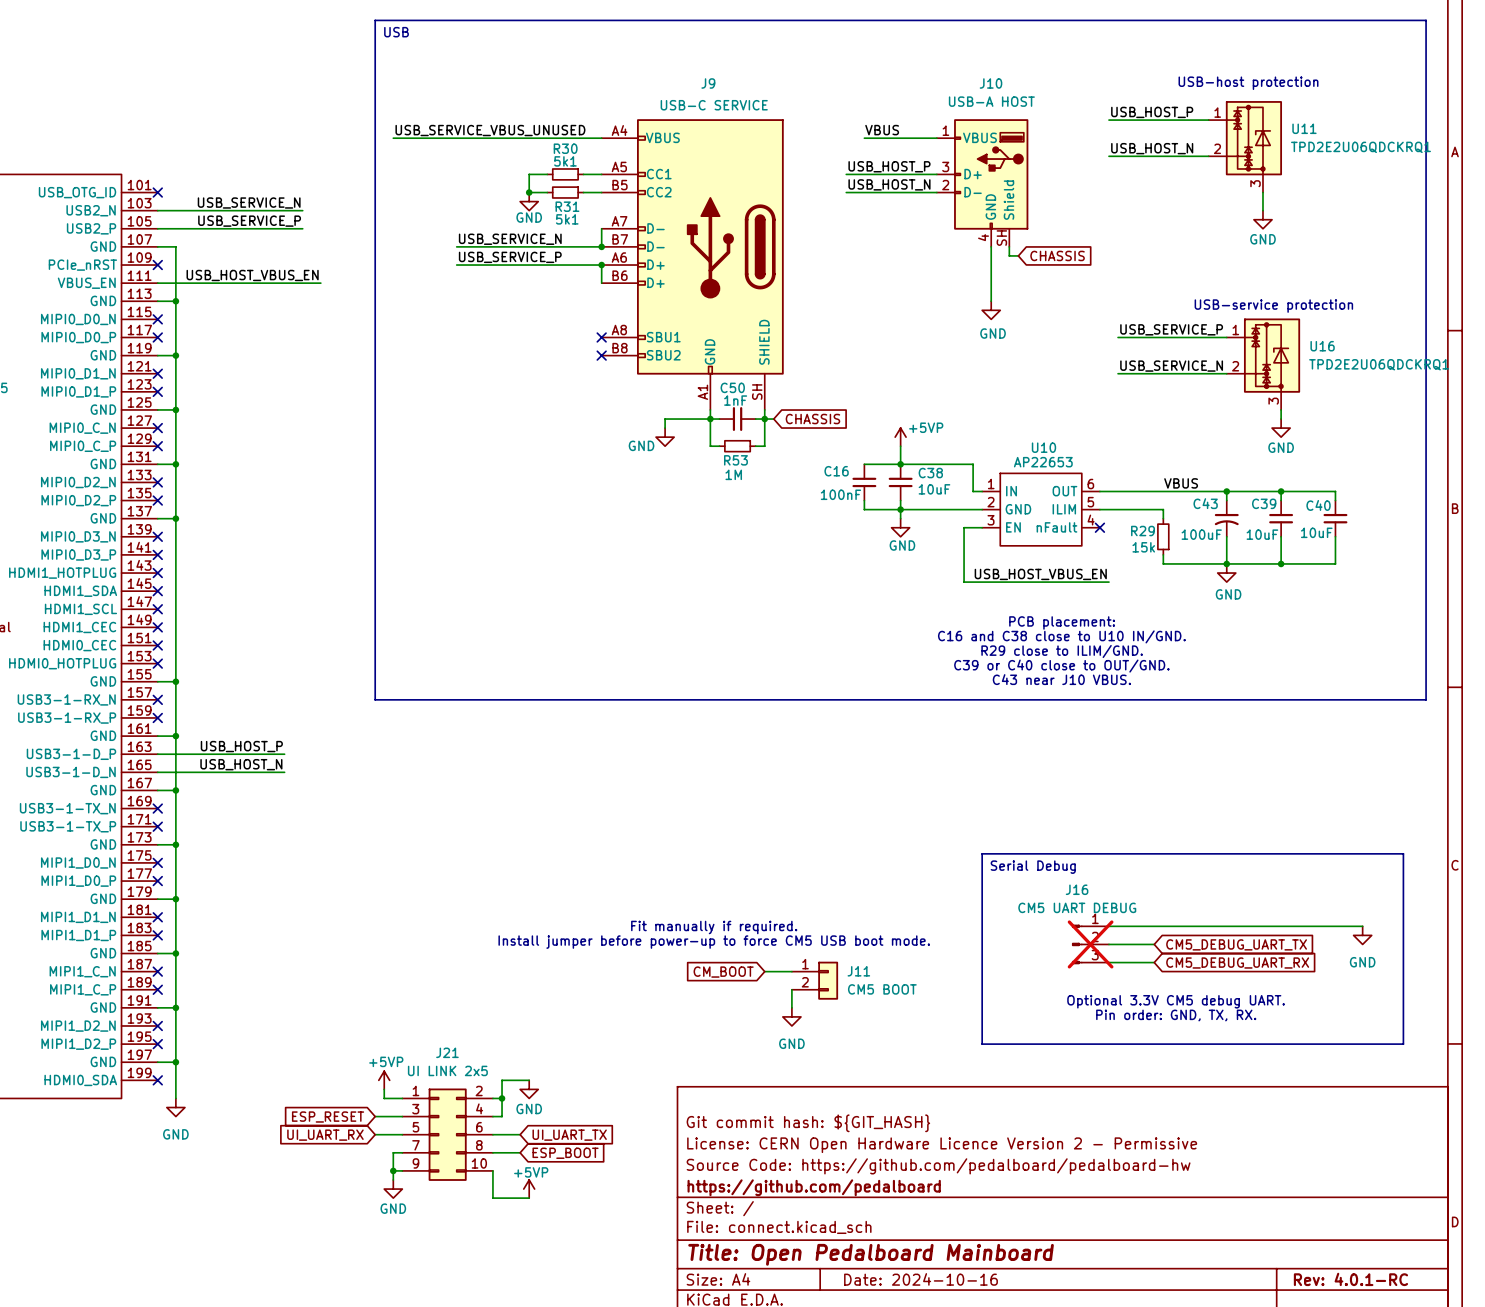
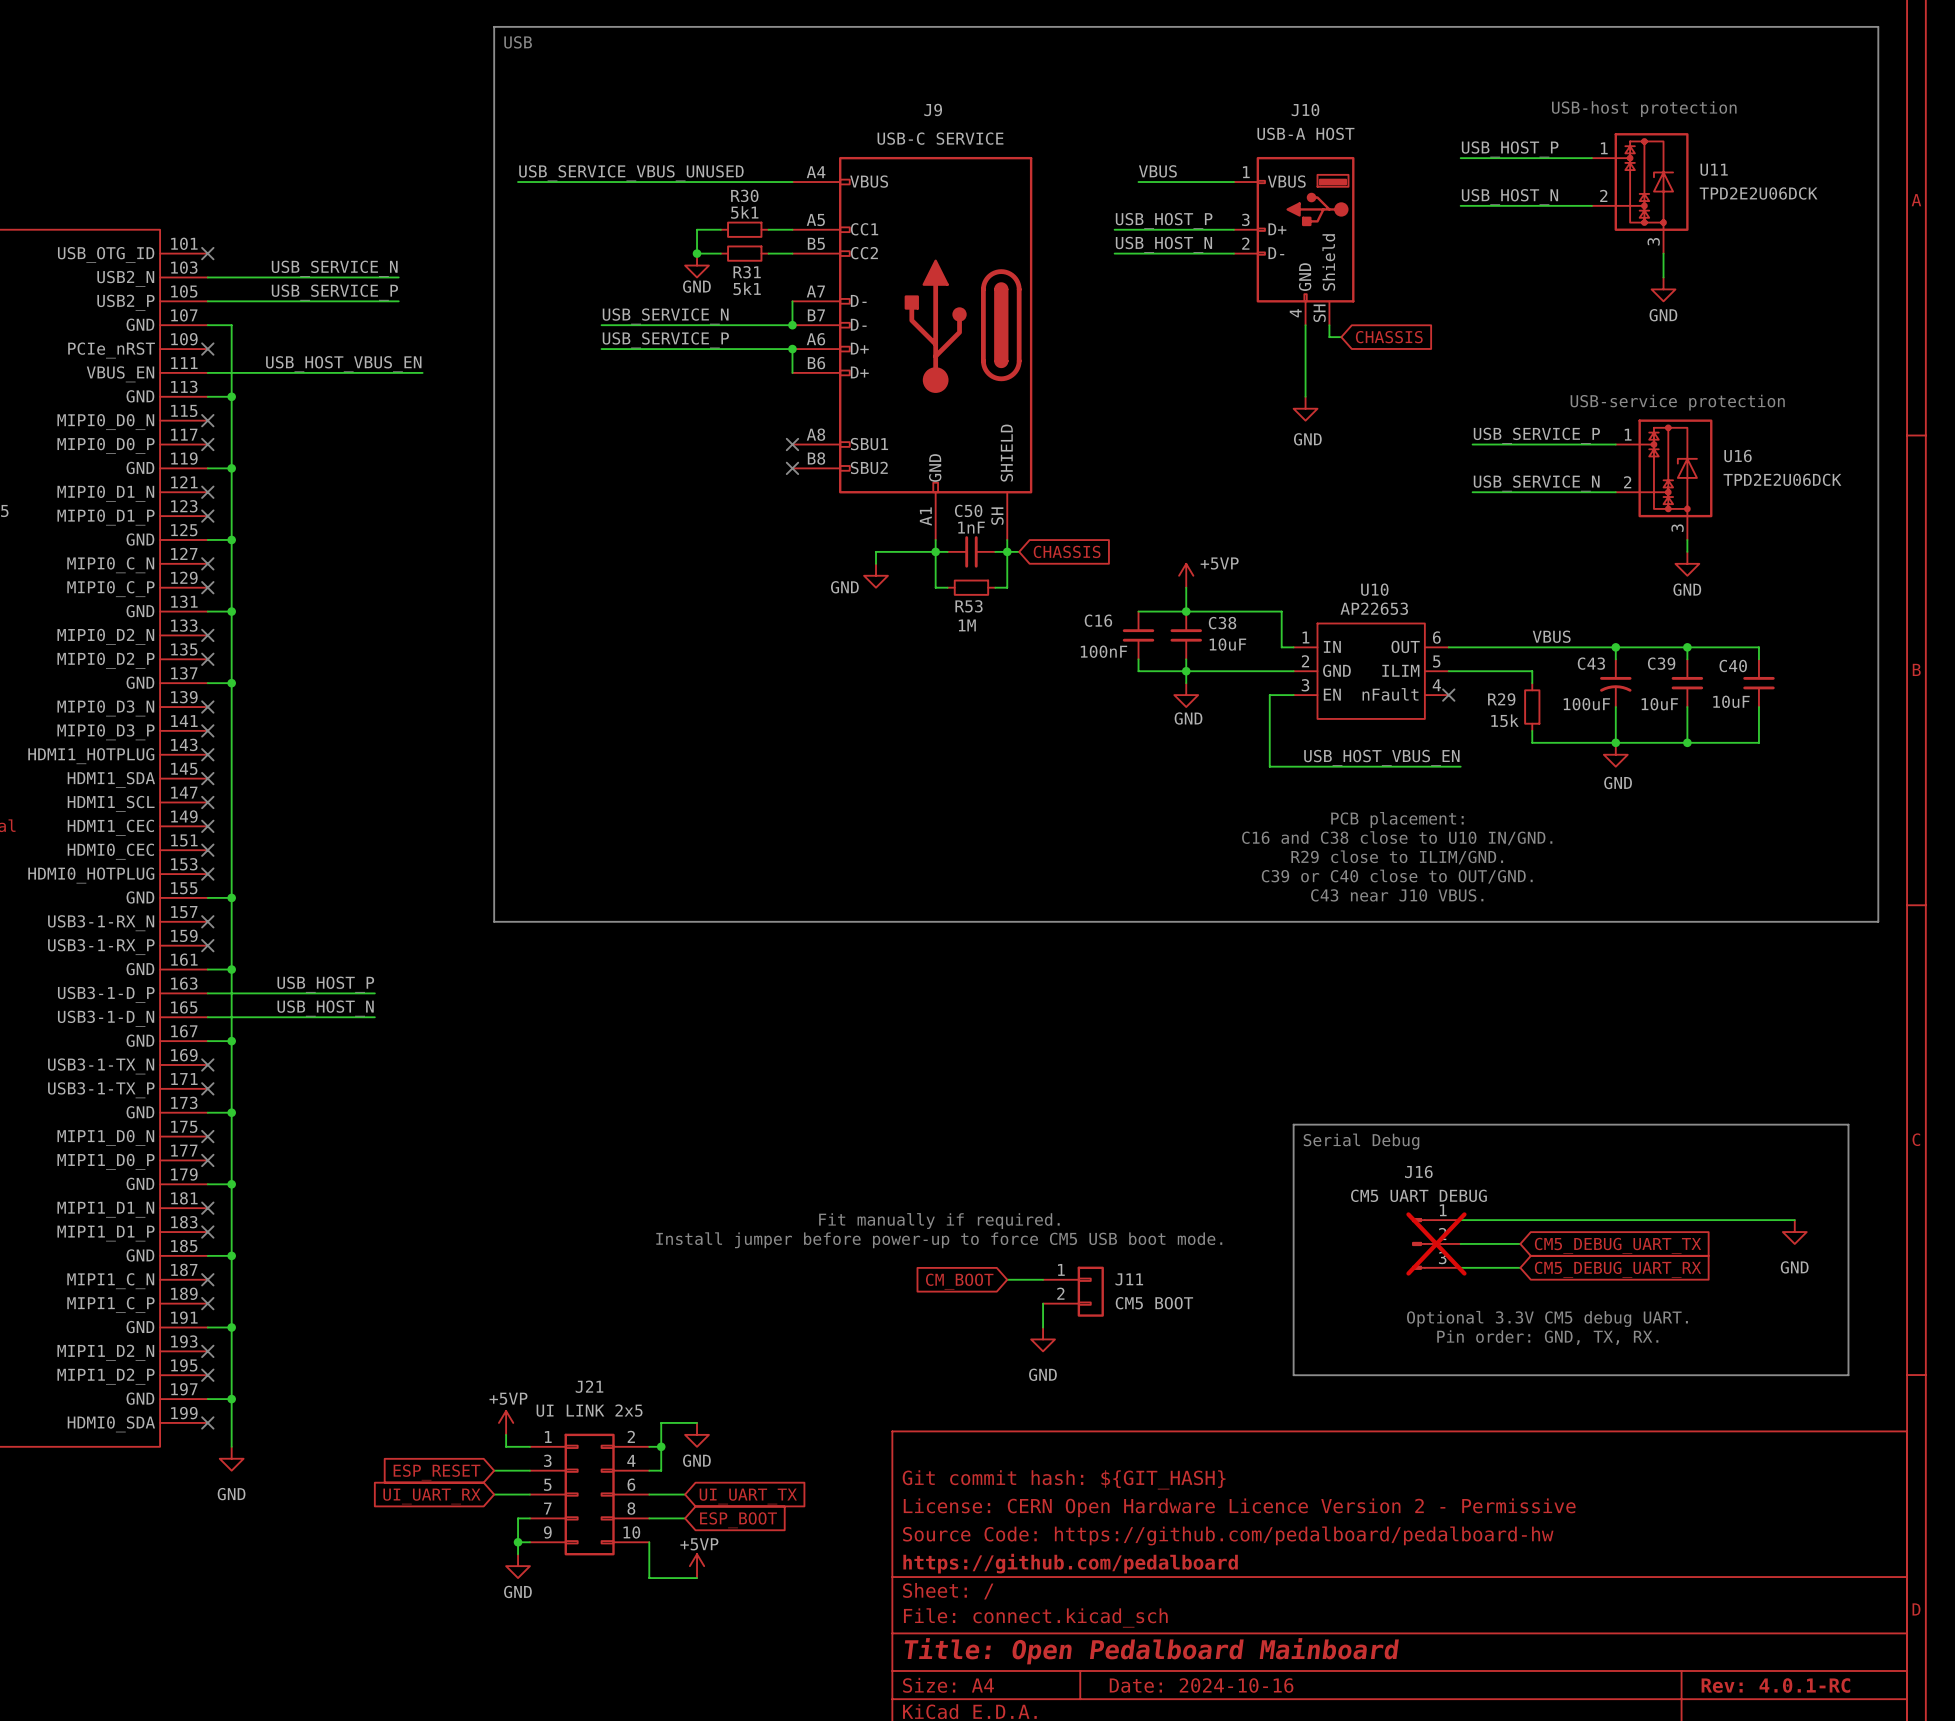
U11 value: TPD2E2U06QDCKRQ1 (1360, 147) -> TPD2E2U06DCK (1758, 193)
U16 value: TPD2E2U06QDCKRQ1 (1379, 364) -> TPD2E2U06DCK (1782, 479)

